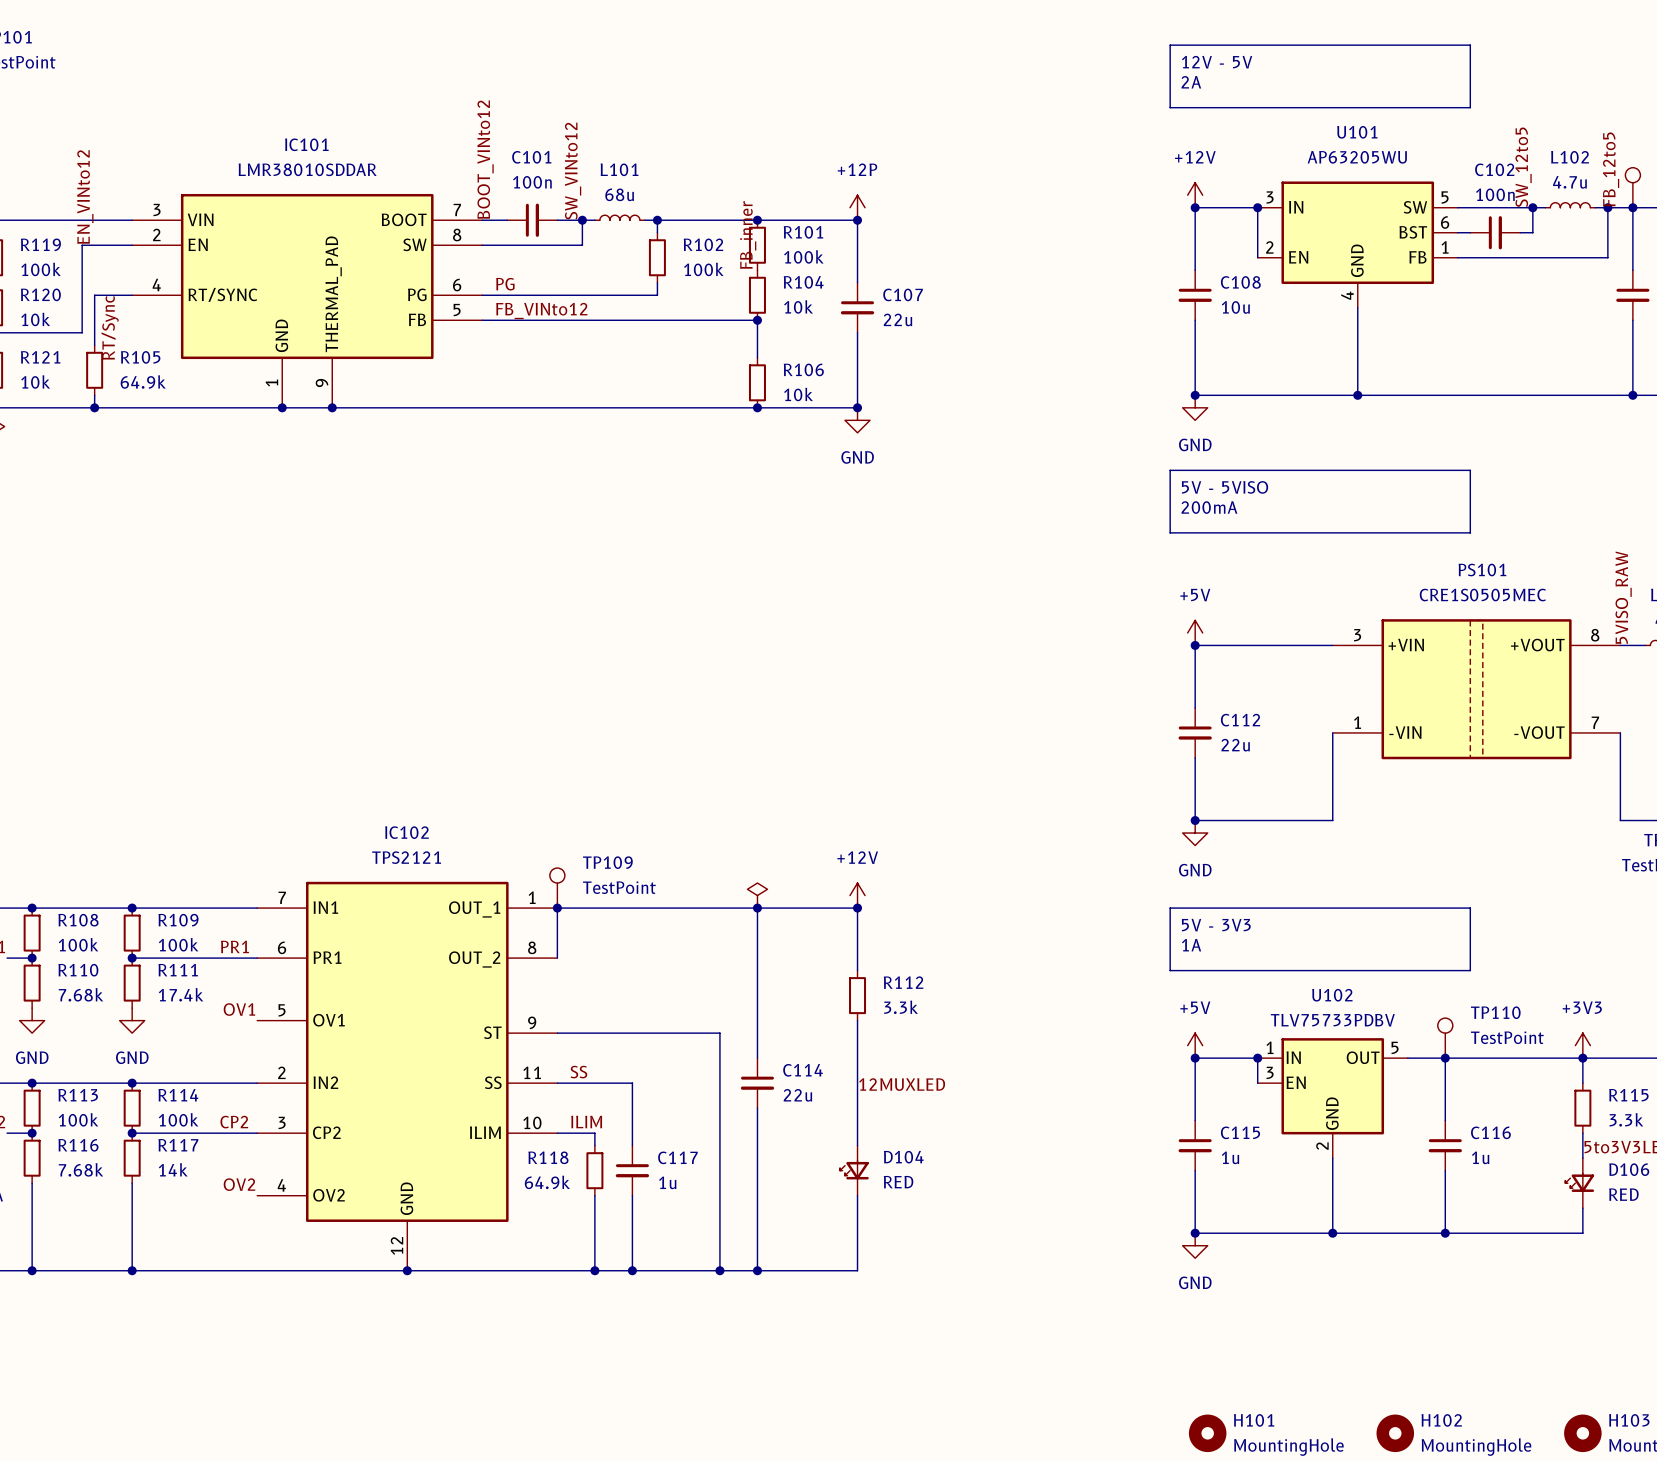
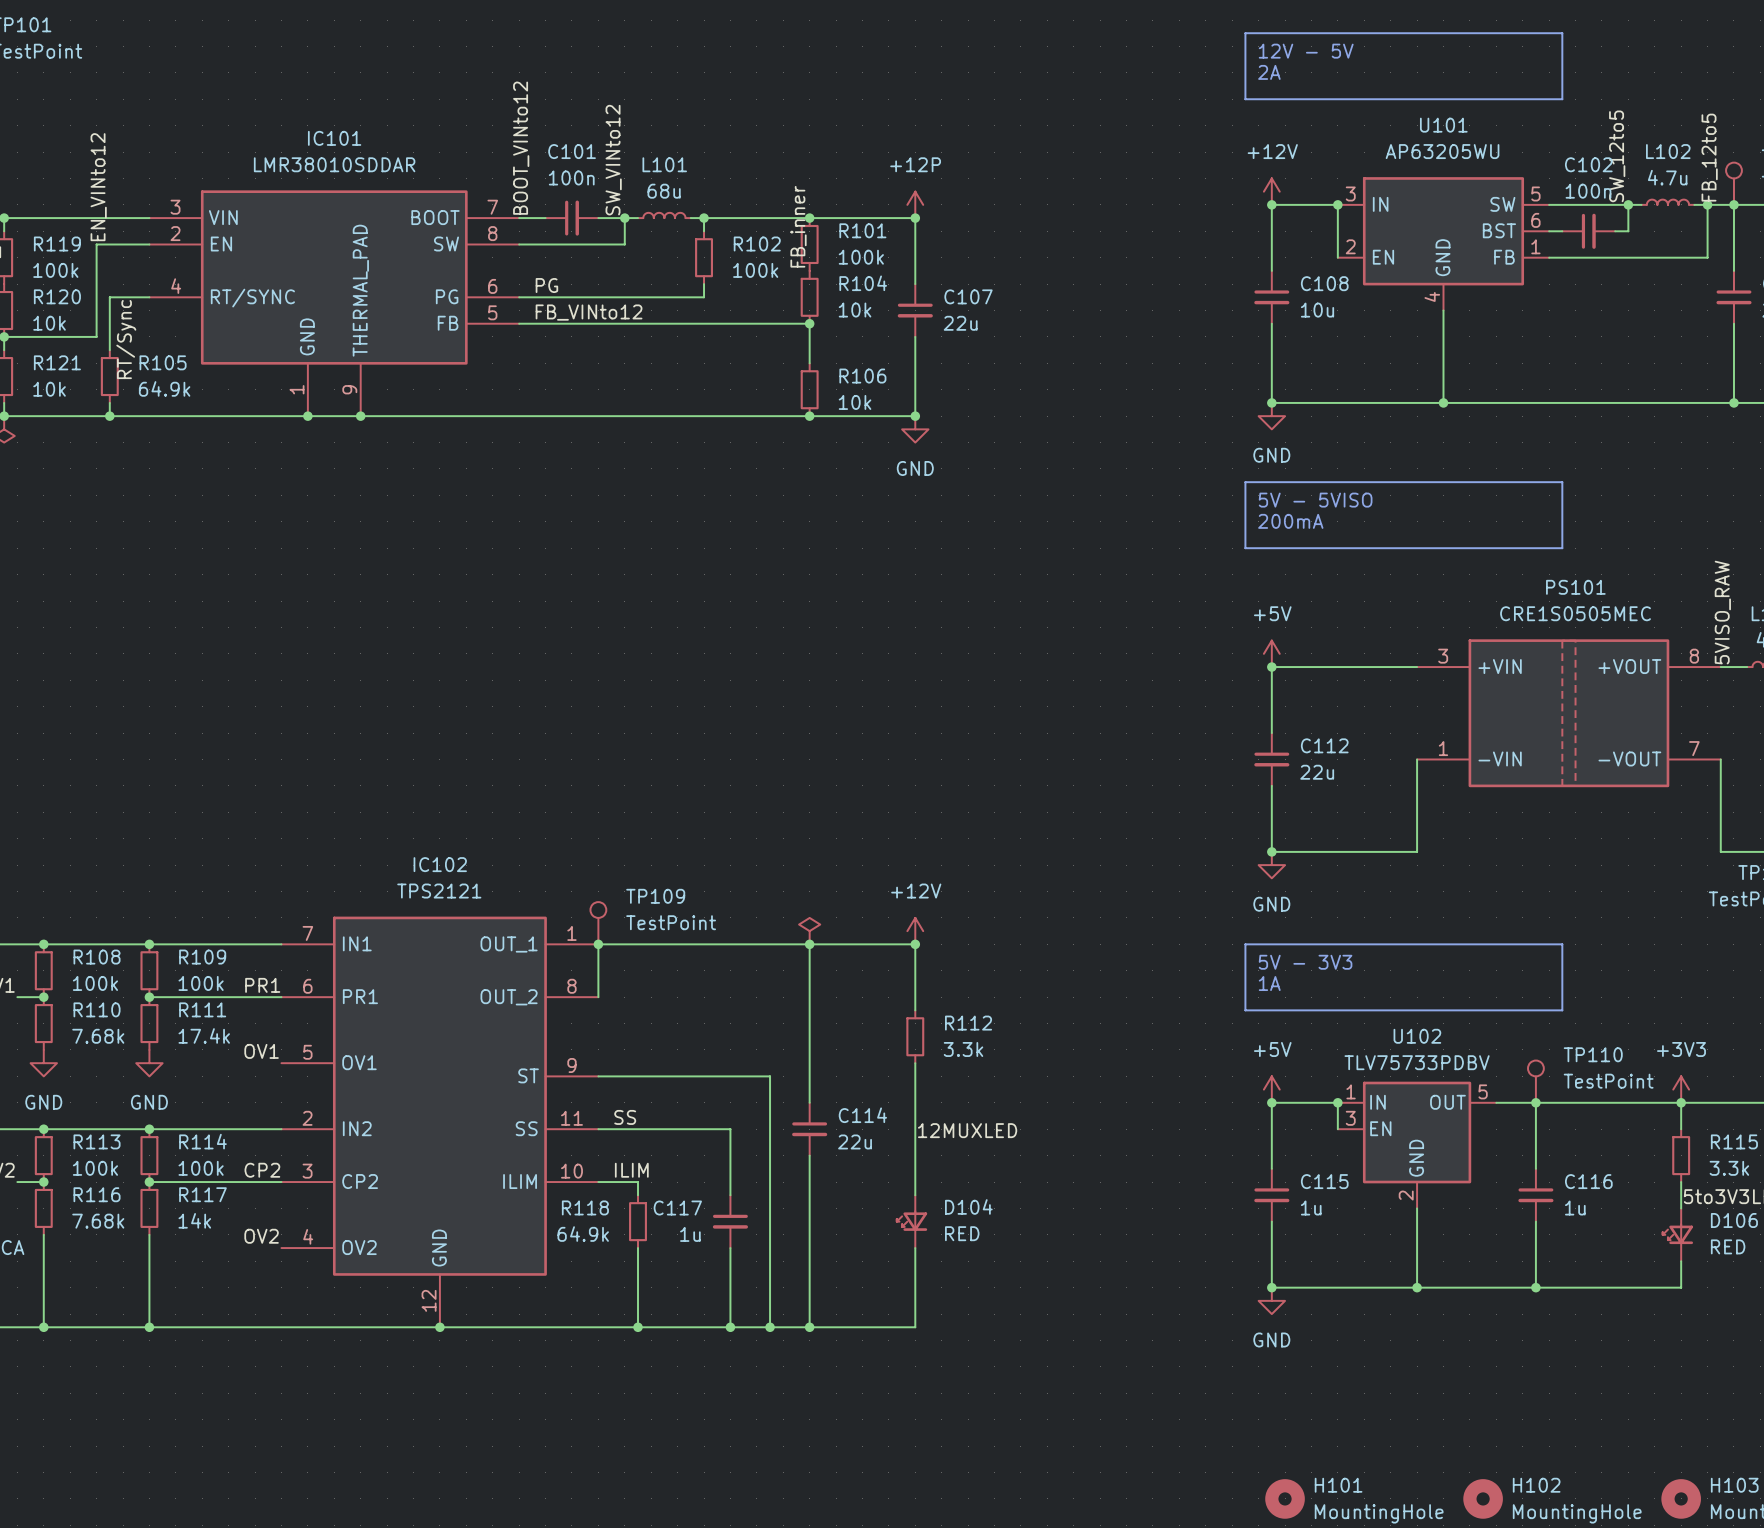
wire: (632, 1083) (632, 1145) -> (677, 1129) (730, 1129) (730, 1195)
C117 name position: C117 (677, 1157) -> C117 (677, 1208)
C117 position: (632, 1170) -> (730, 1221)
C117 value position: 1u (667, 1182) -> 1u (690, 1234)
wire: (632, 1195) (632, 1270) -> (730, 1248) (730, 1327)
junction position: (632, 1270) -> (730, 1327)

